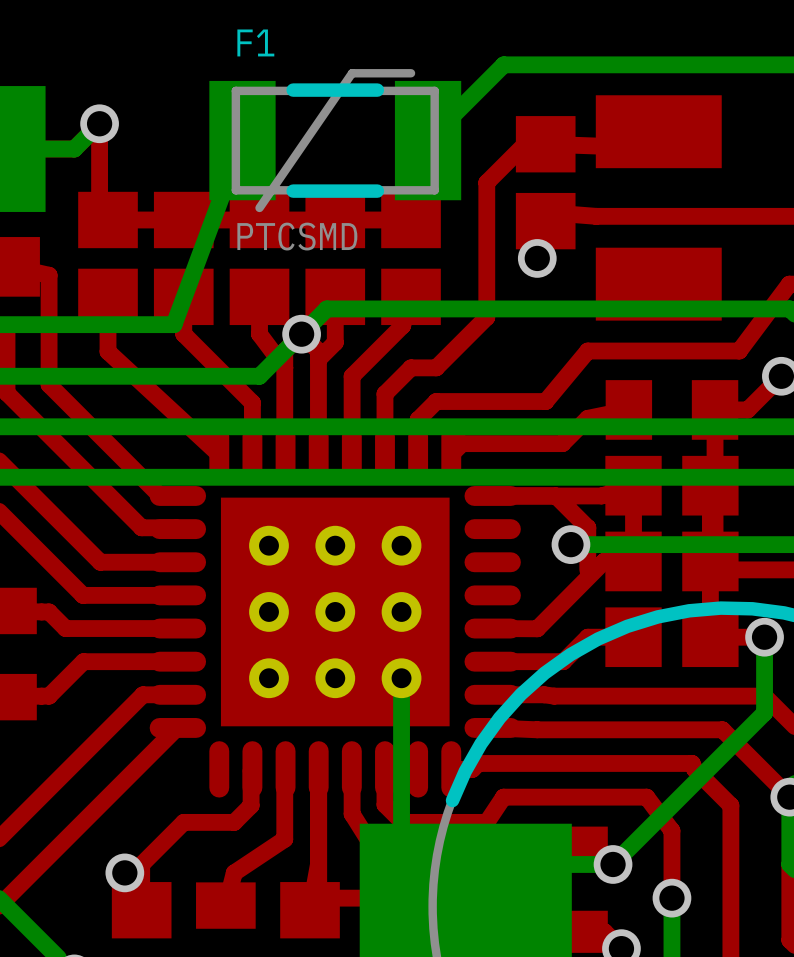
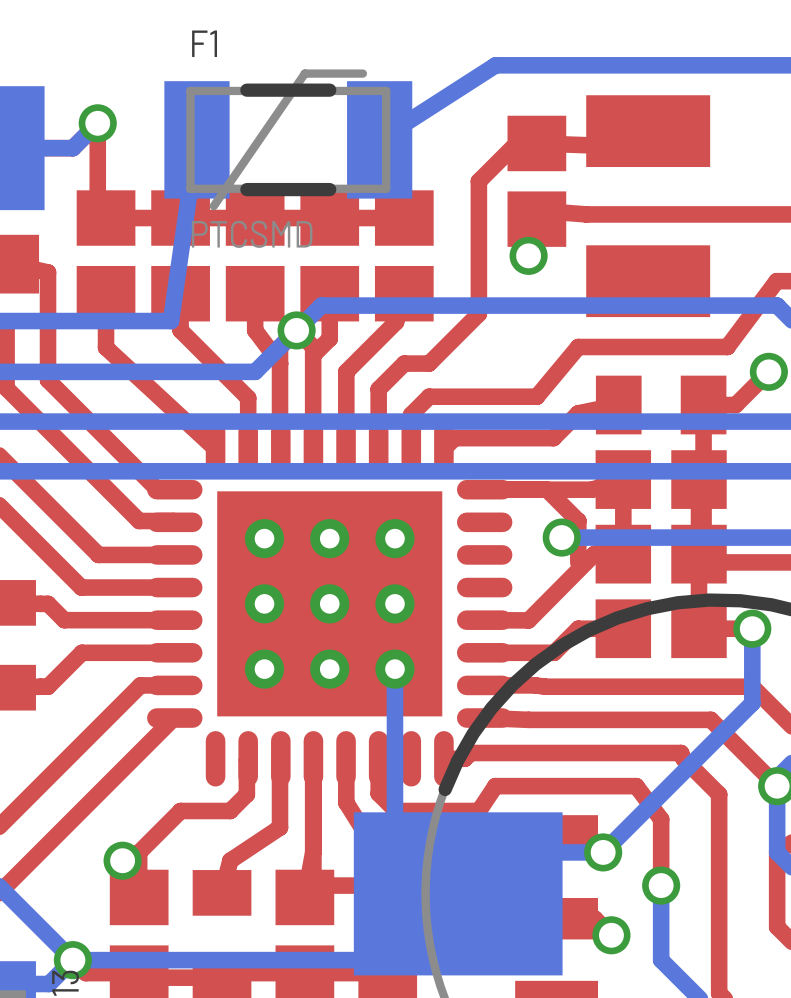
bottom track: (503, 64) (428, 140) -> (495, 65) (379, 139)
bottom track: (242, 140) (174, 324) -> (196, 139) (171, 321)
F1 position: (335, 140) -> (288, 139)

